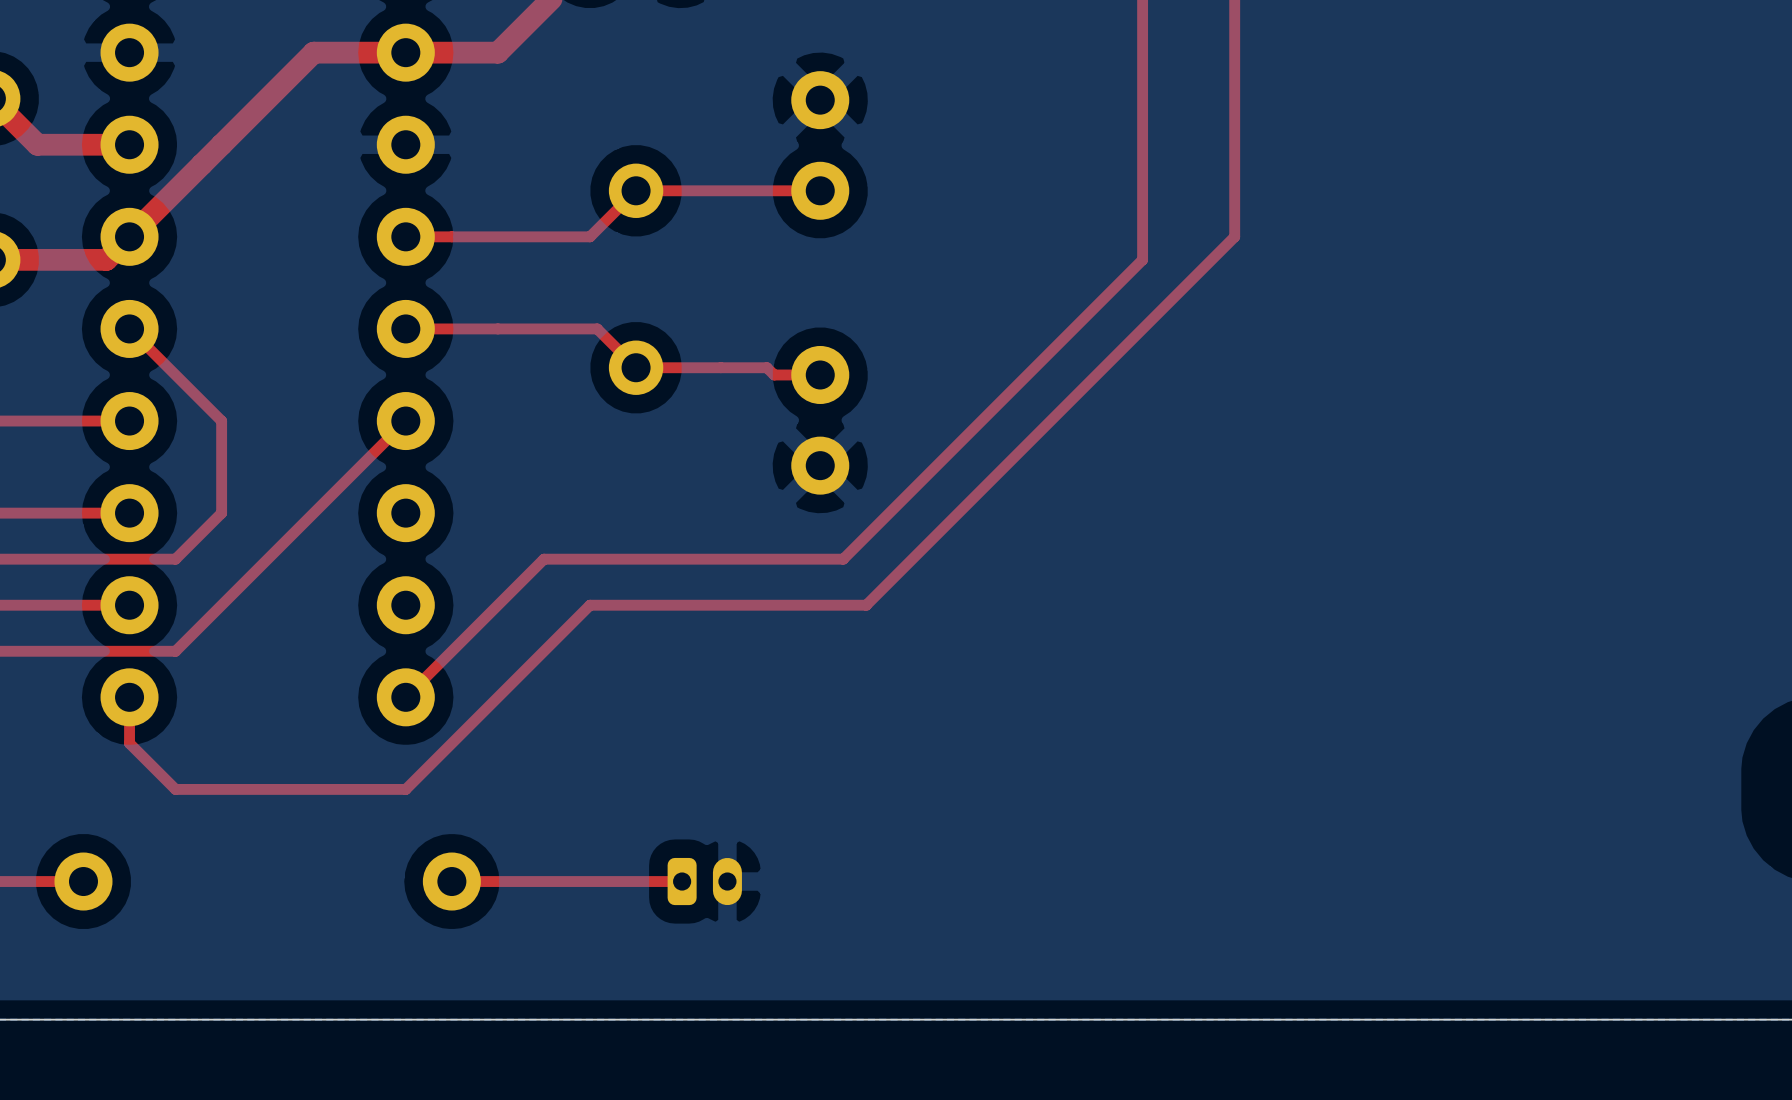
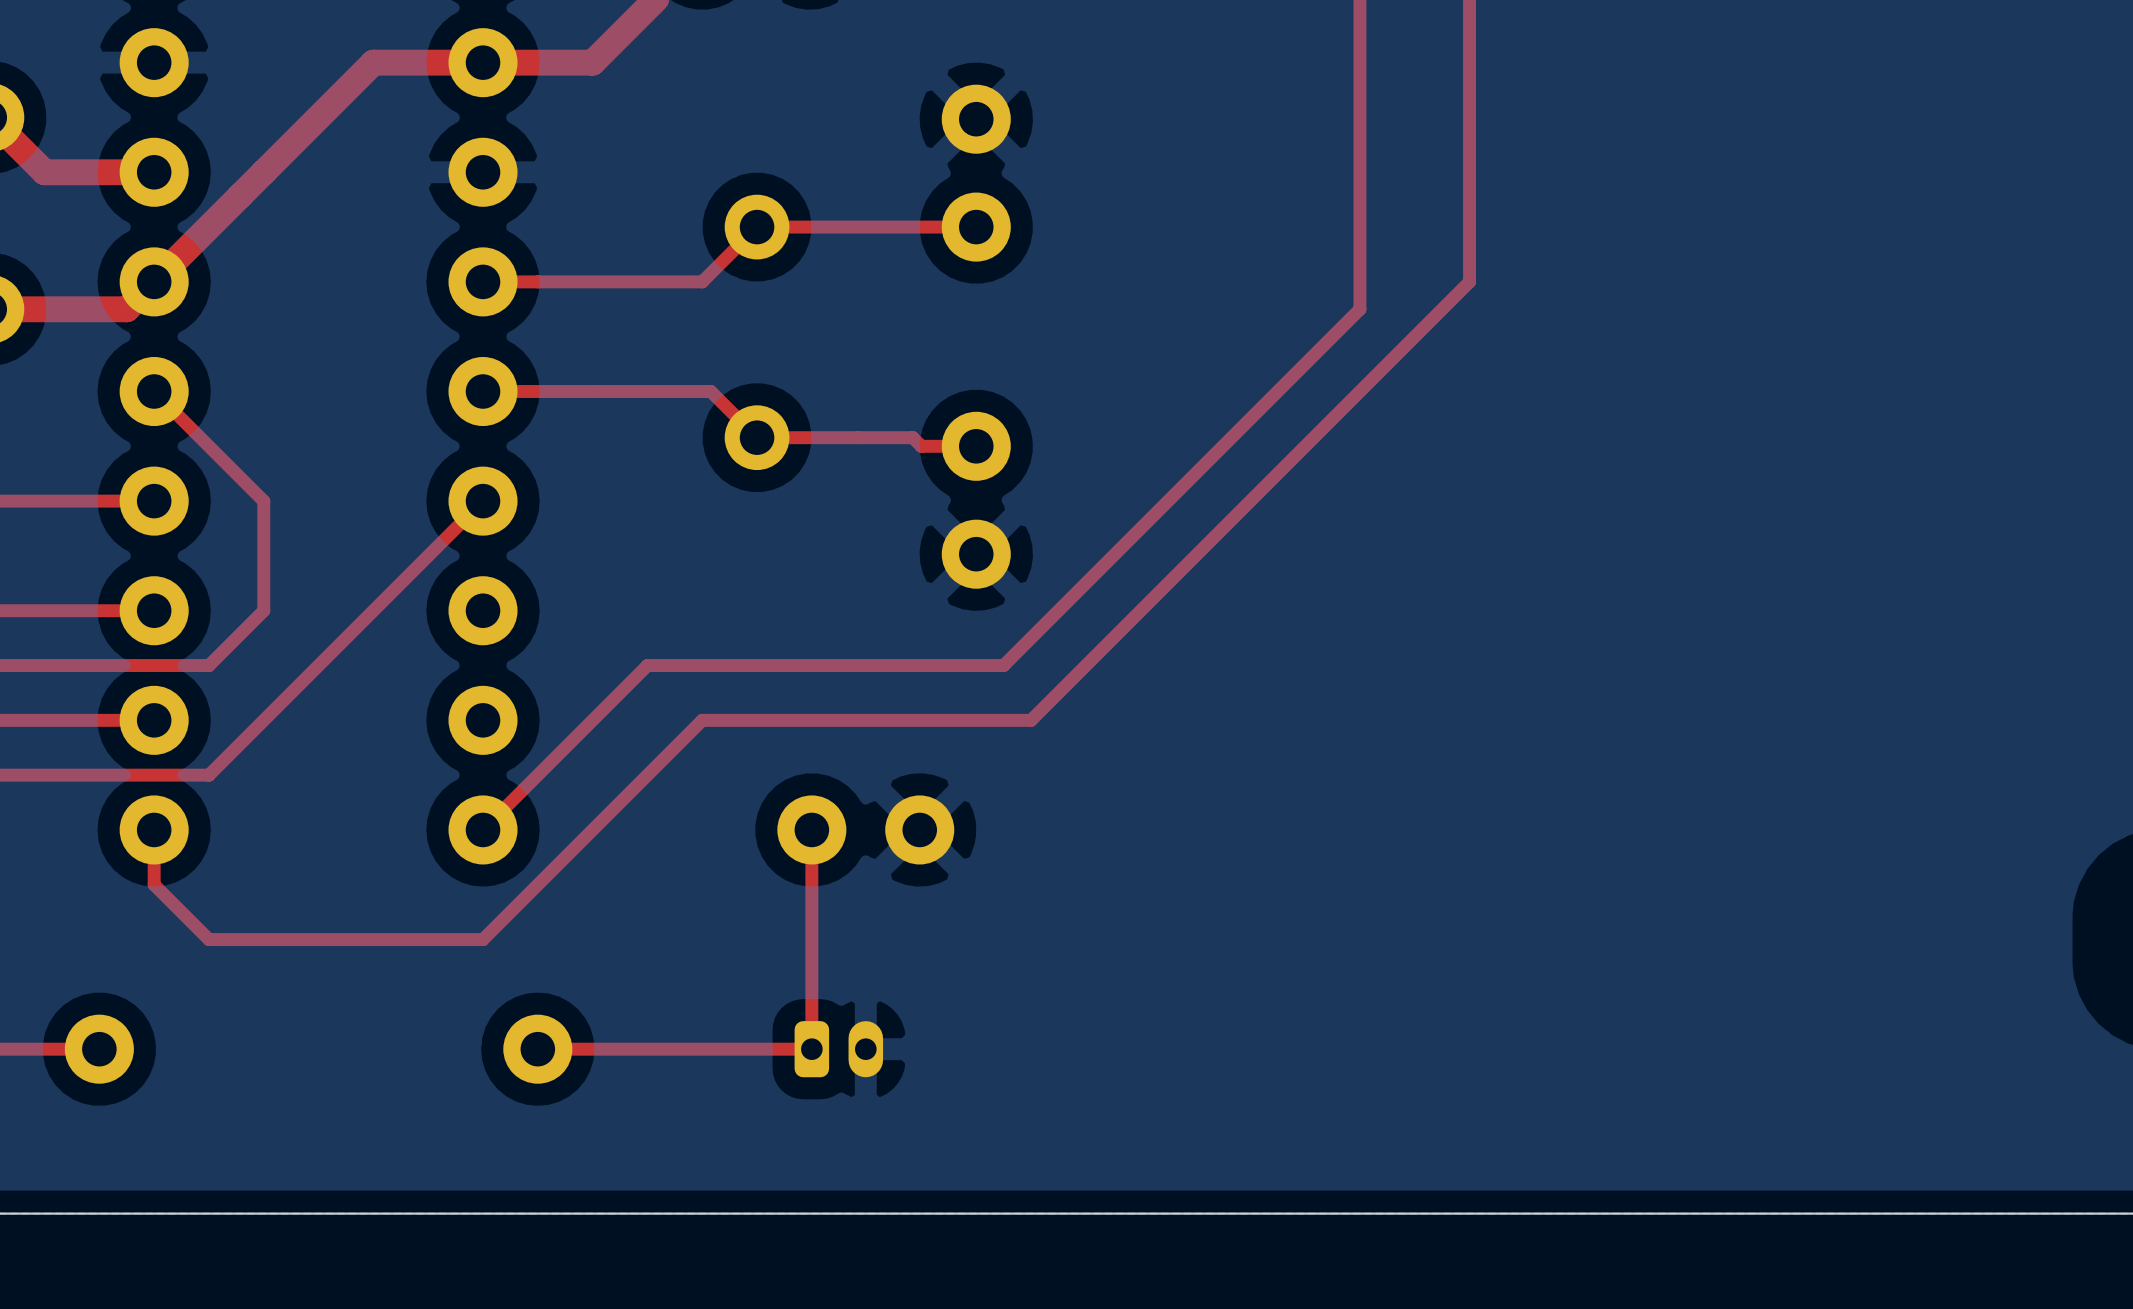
top track: none -> (811, 829) (811, 1049)
part: none -> (865, 829)

